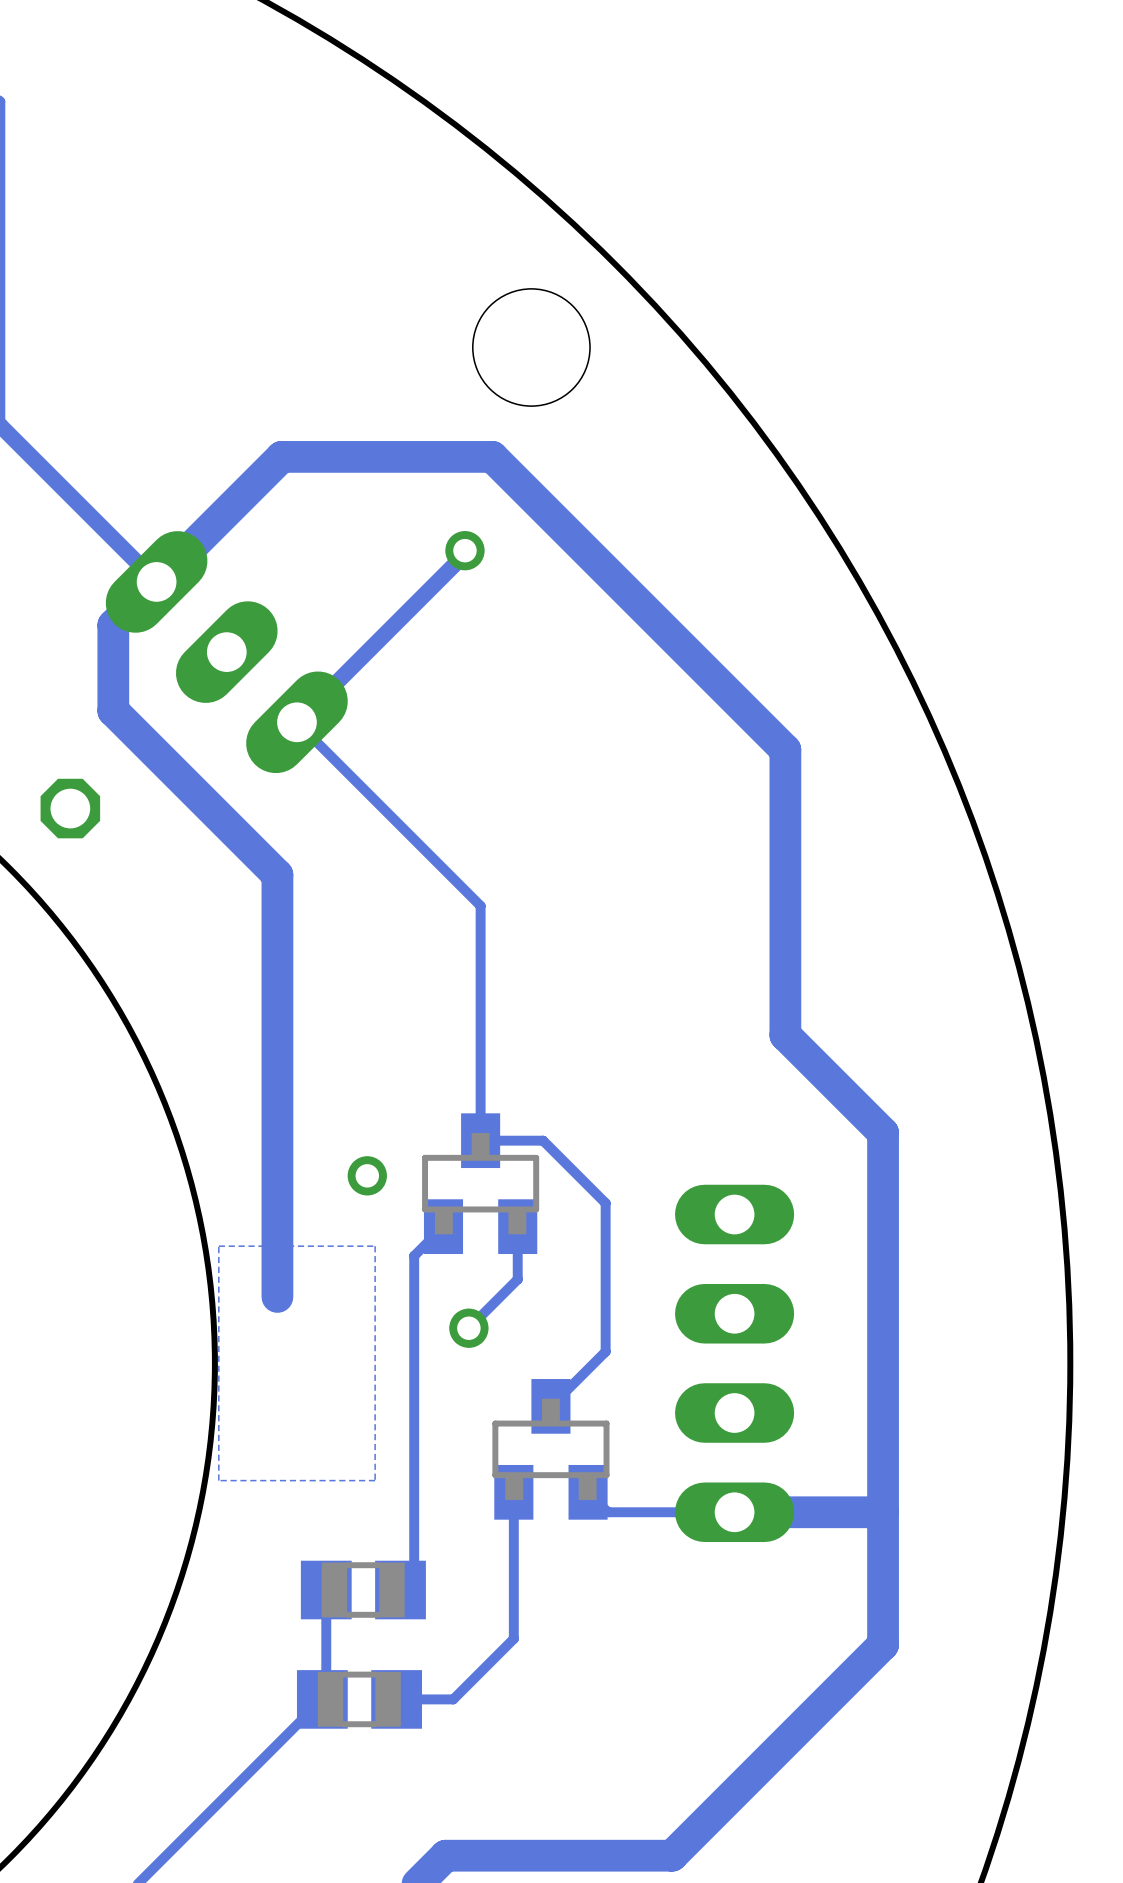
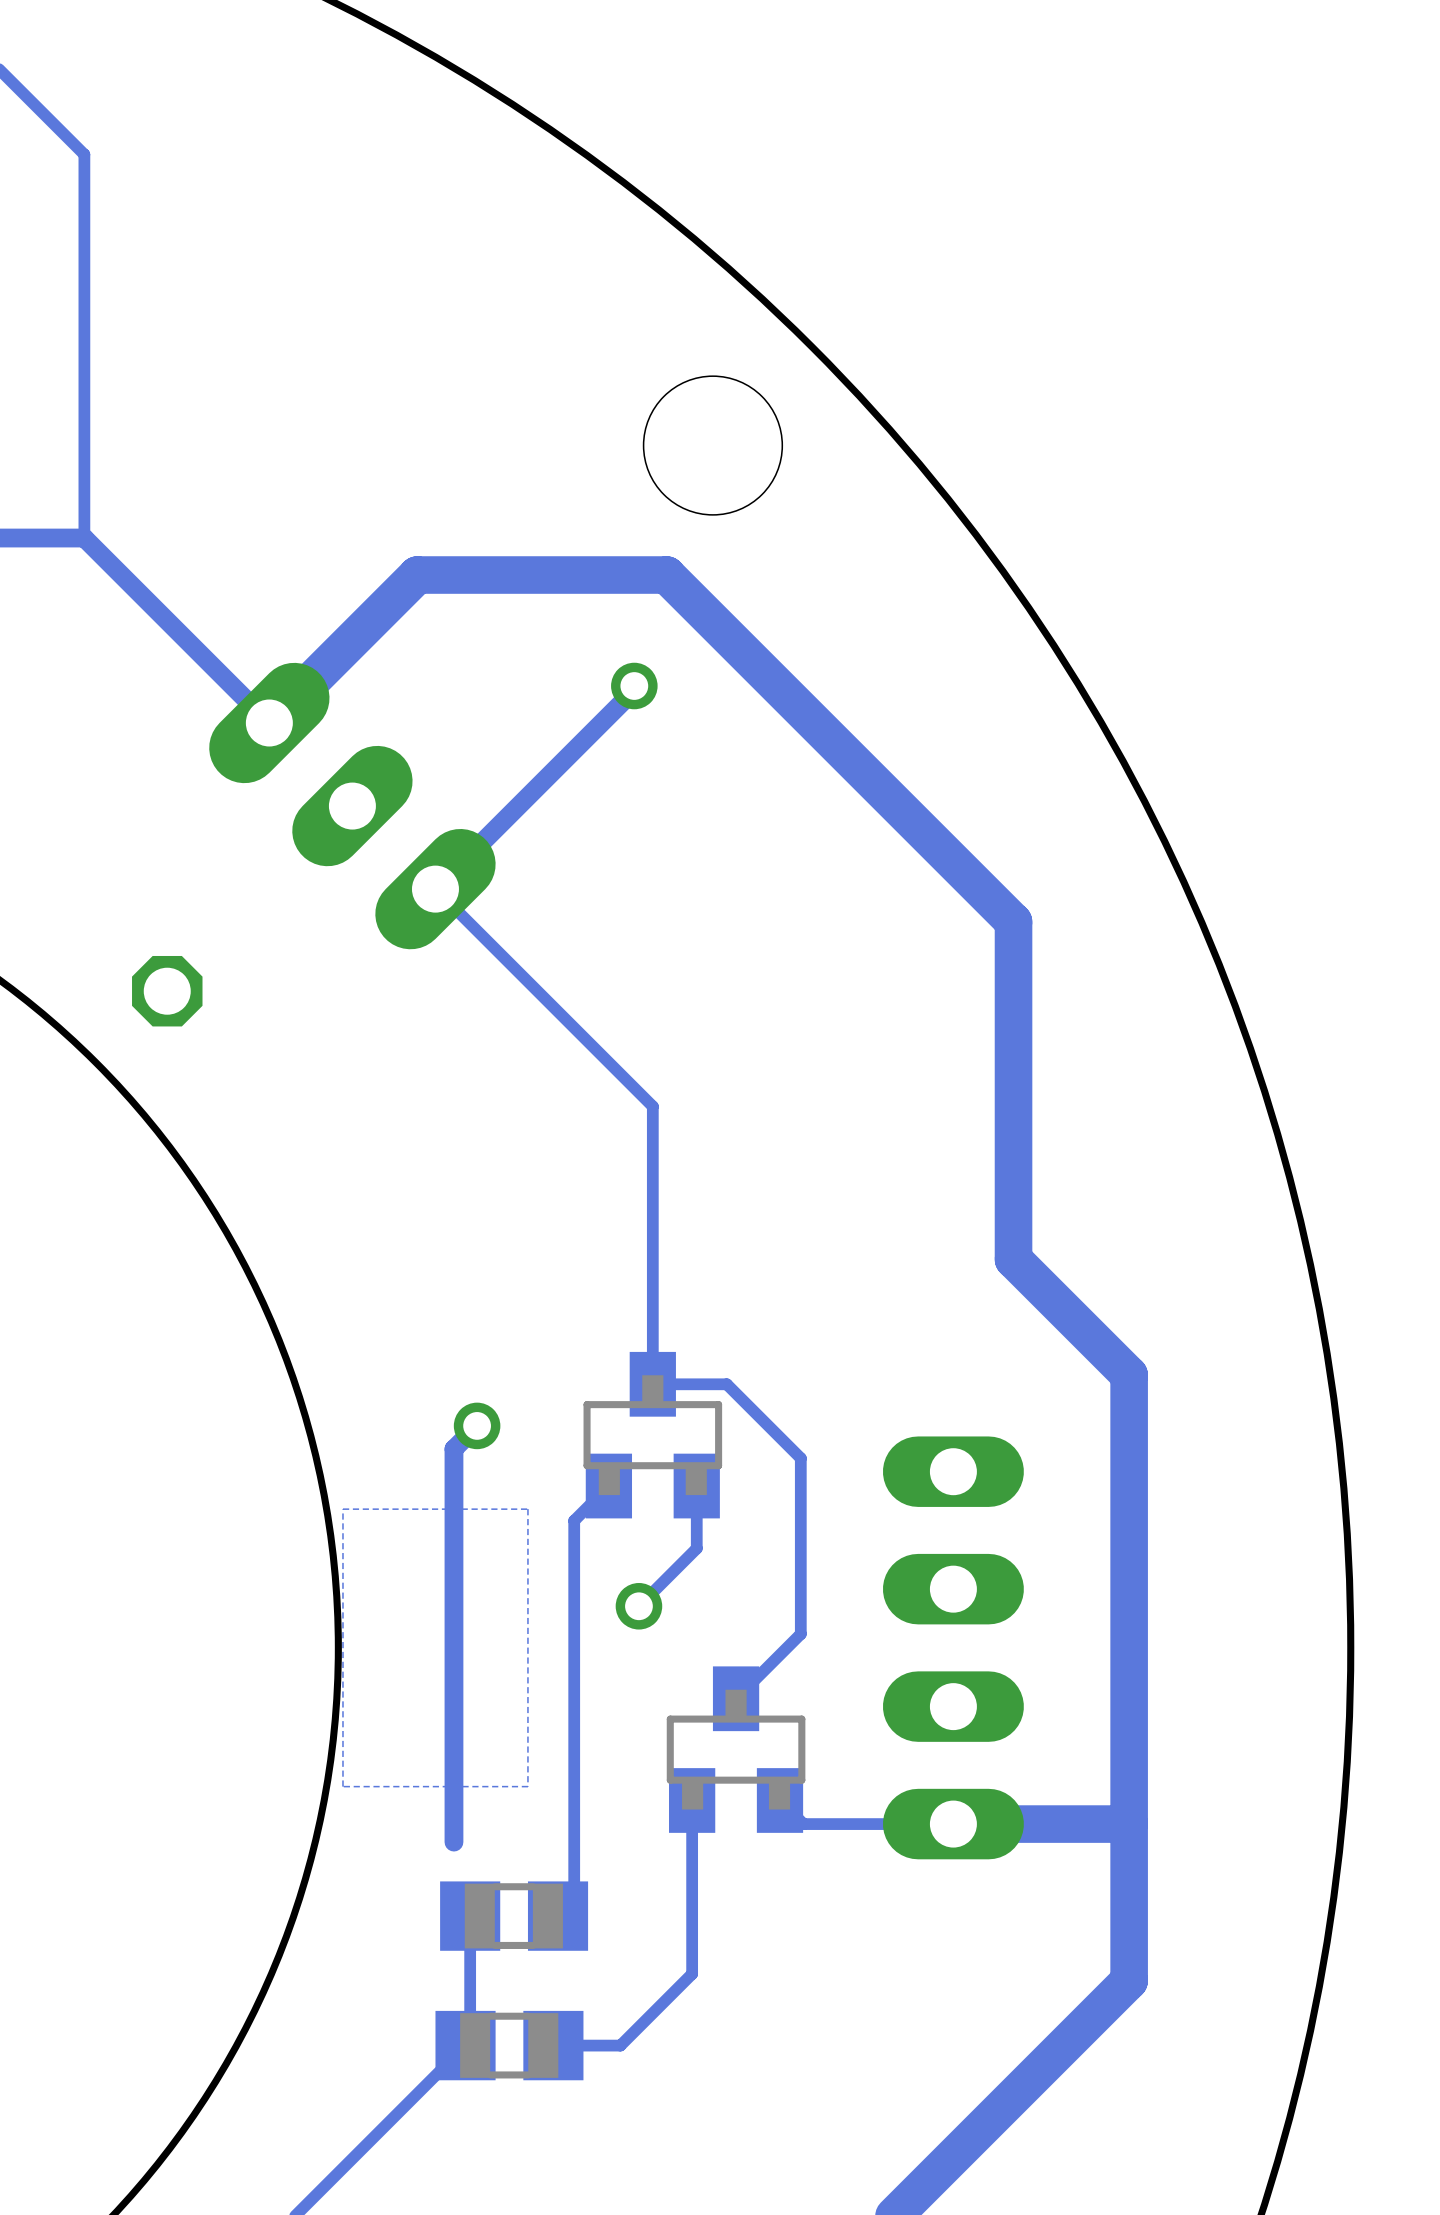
track: (156, 581) (113, 625) (113, 710) (277, 874) (277, 1296) -> none
track: none -> (477, 1425) (453, 1449) (453, 1842)
via position: (367, 1175) -> (477, 1425)

